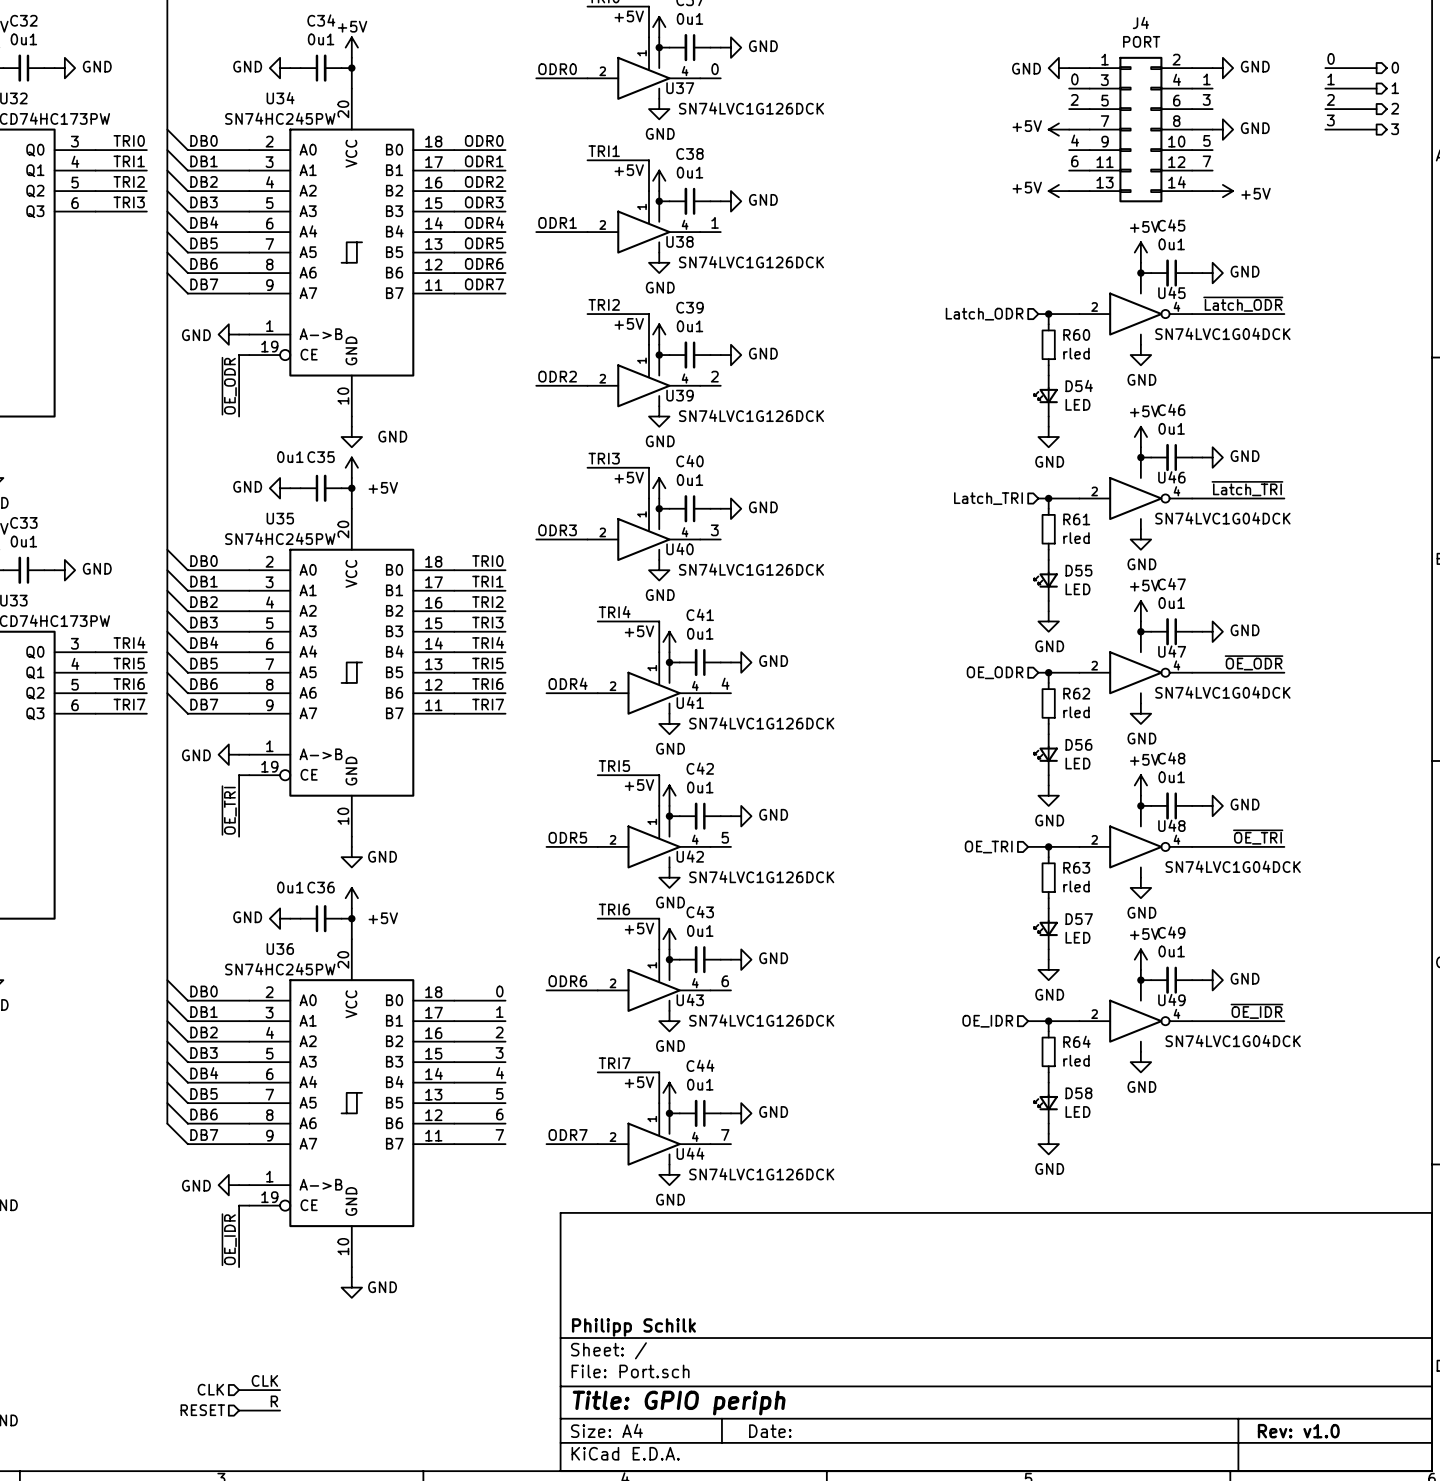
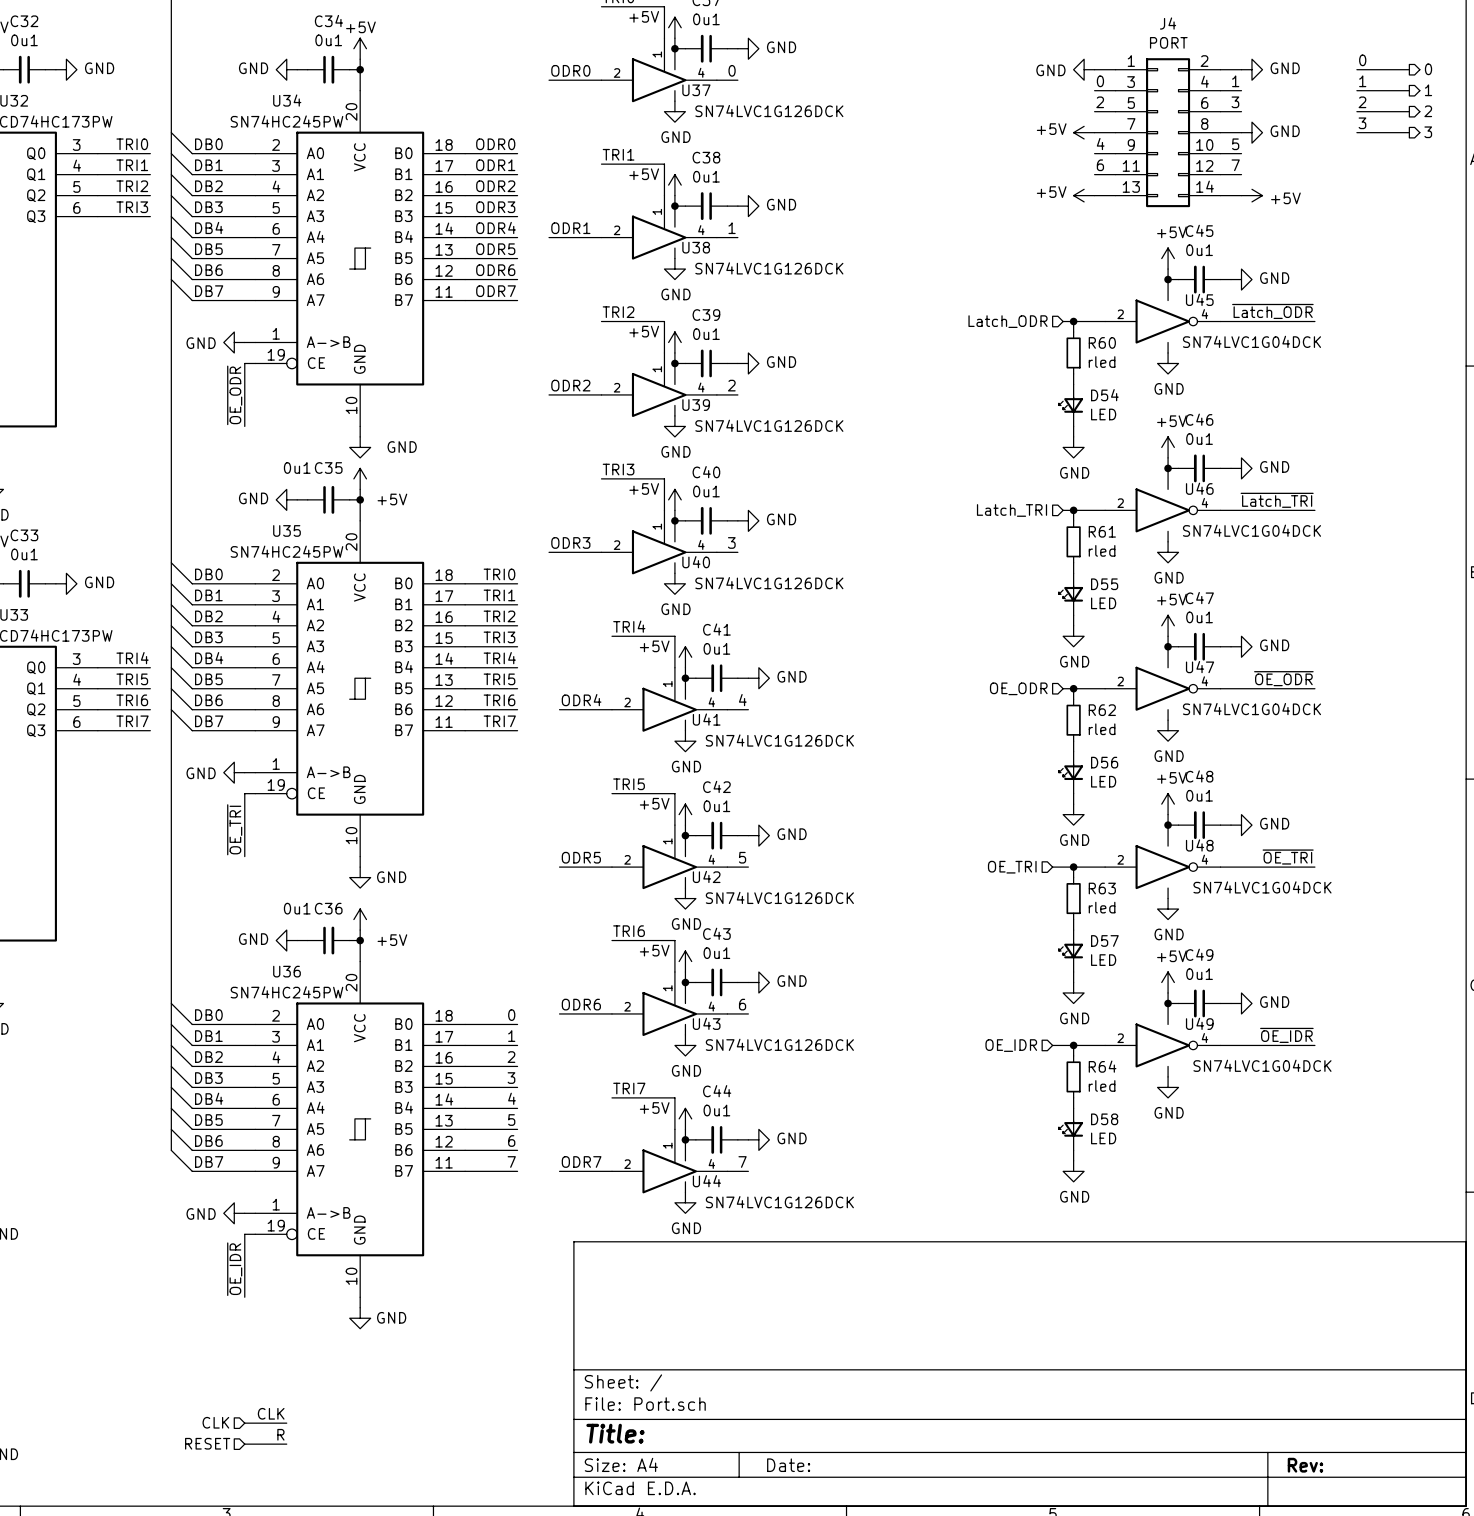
title block: Philipp Schilk (633, 1327) -> none
title block: Title: GPIO periph (679, 1403) -> Title: (615, 1433)
title block: Rev: v1.0 (1298, 1431) -> Rev: (1305, 1465)

